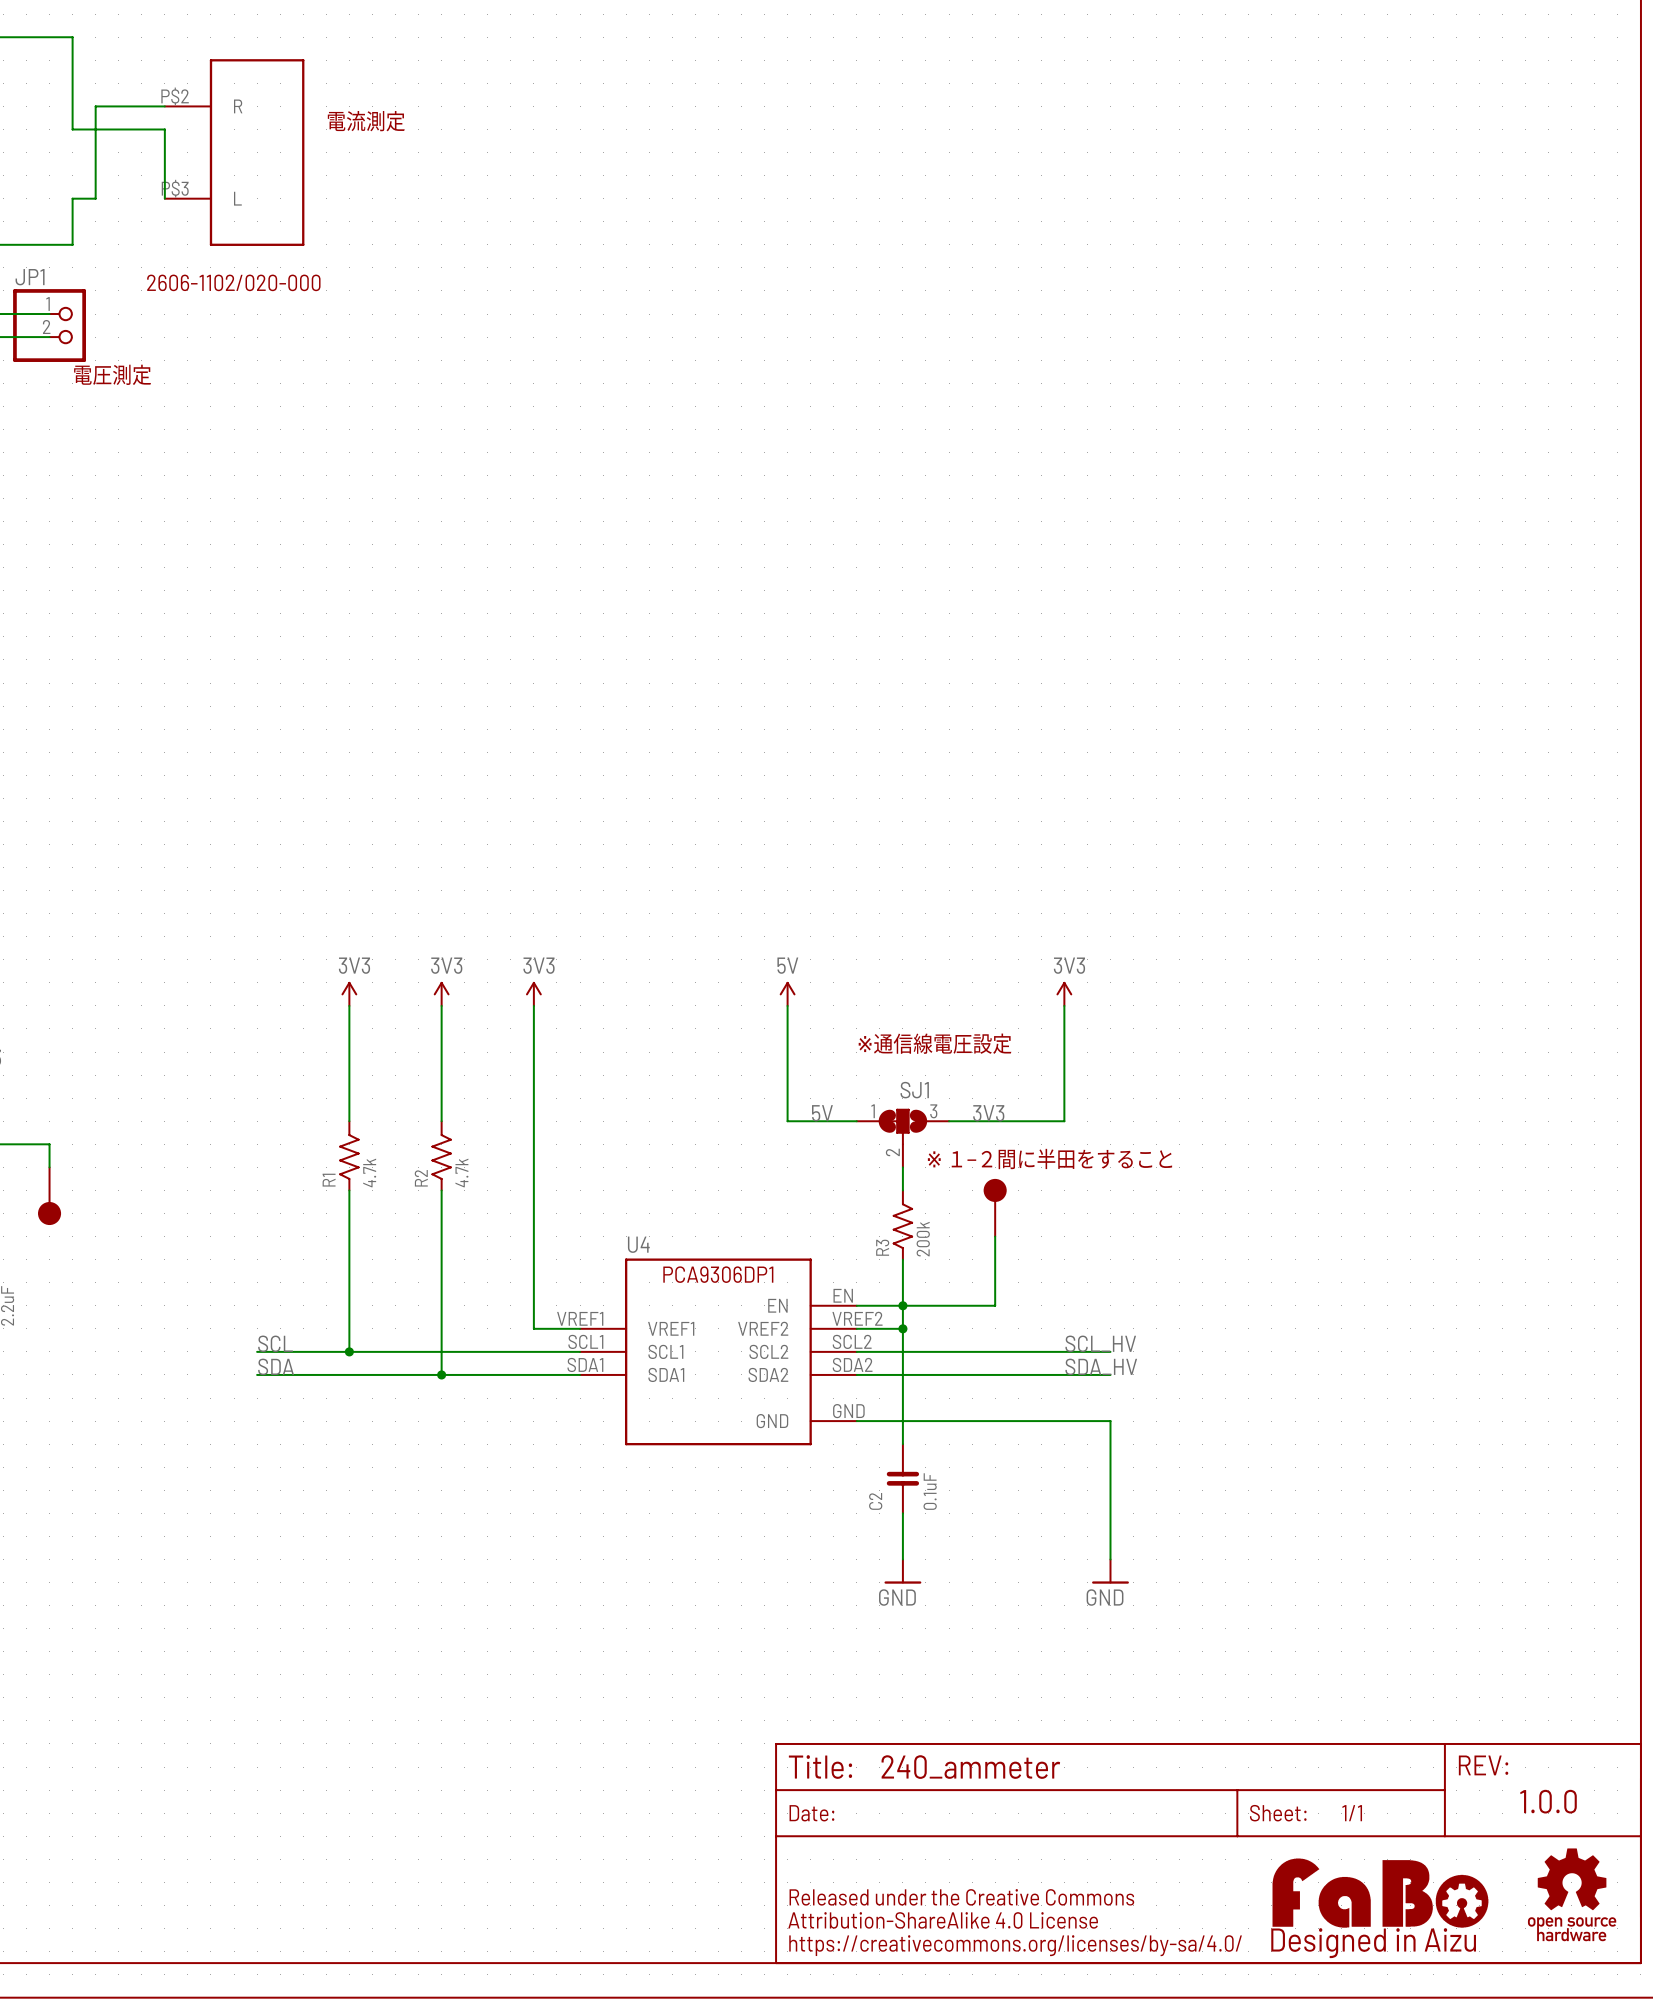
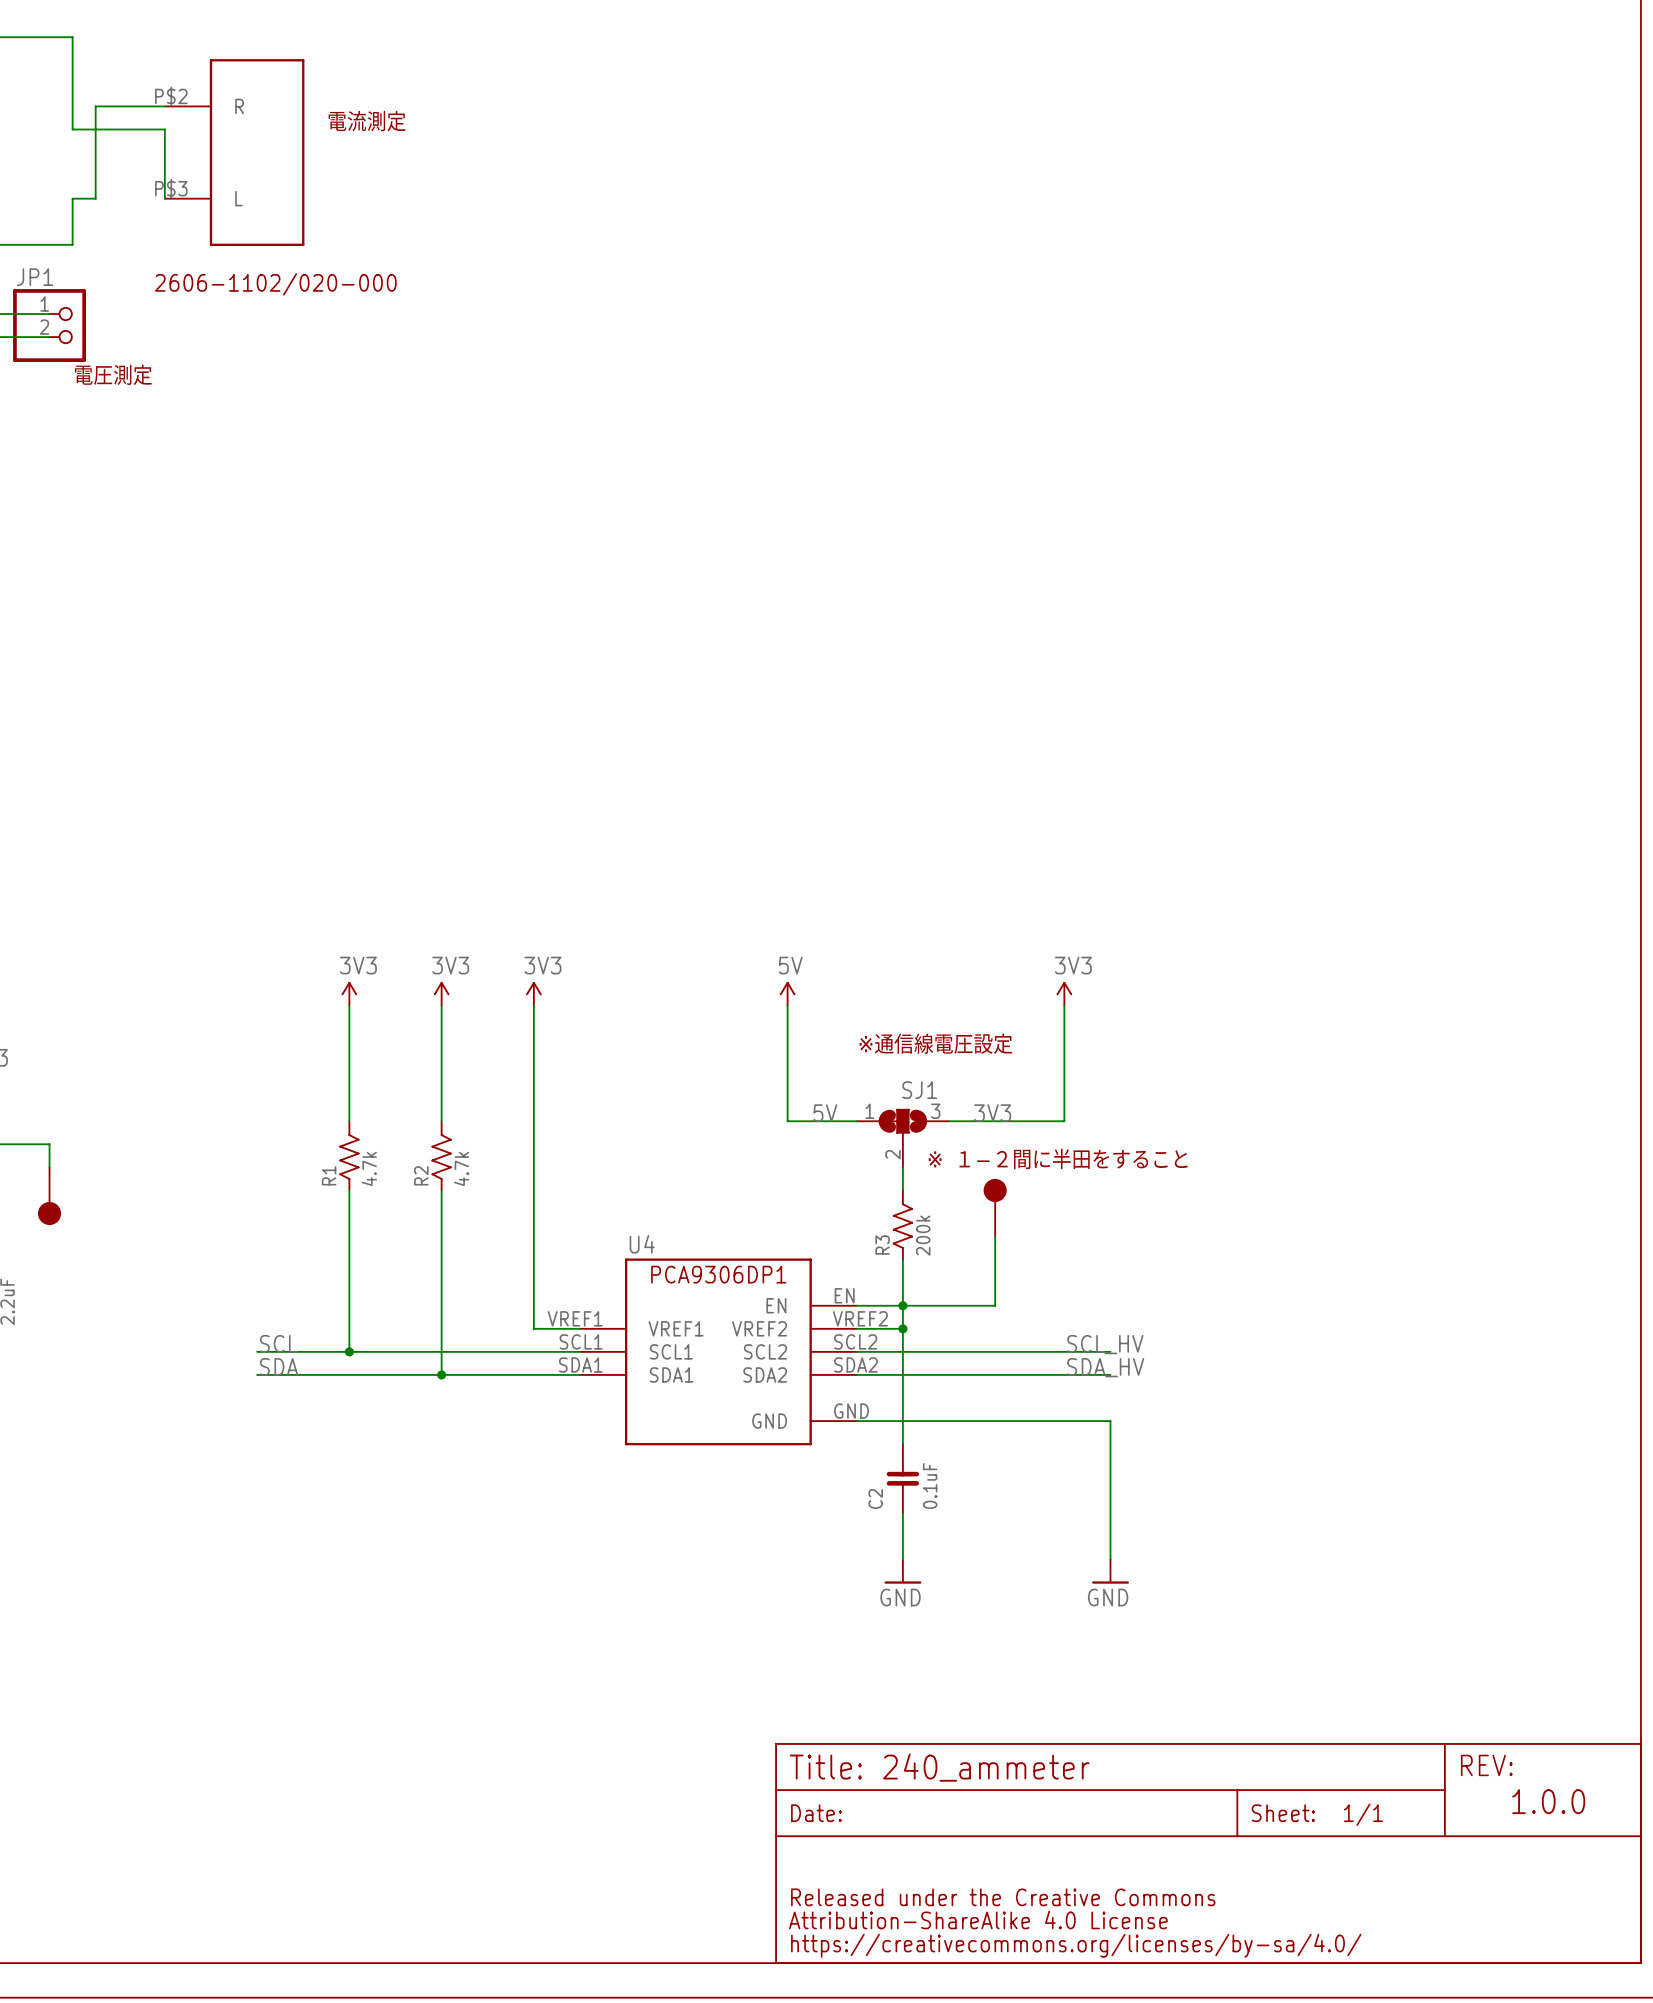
part: (1380, 1893) -> none
part: (1572, 1894) -> none

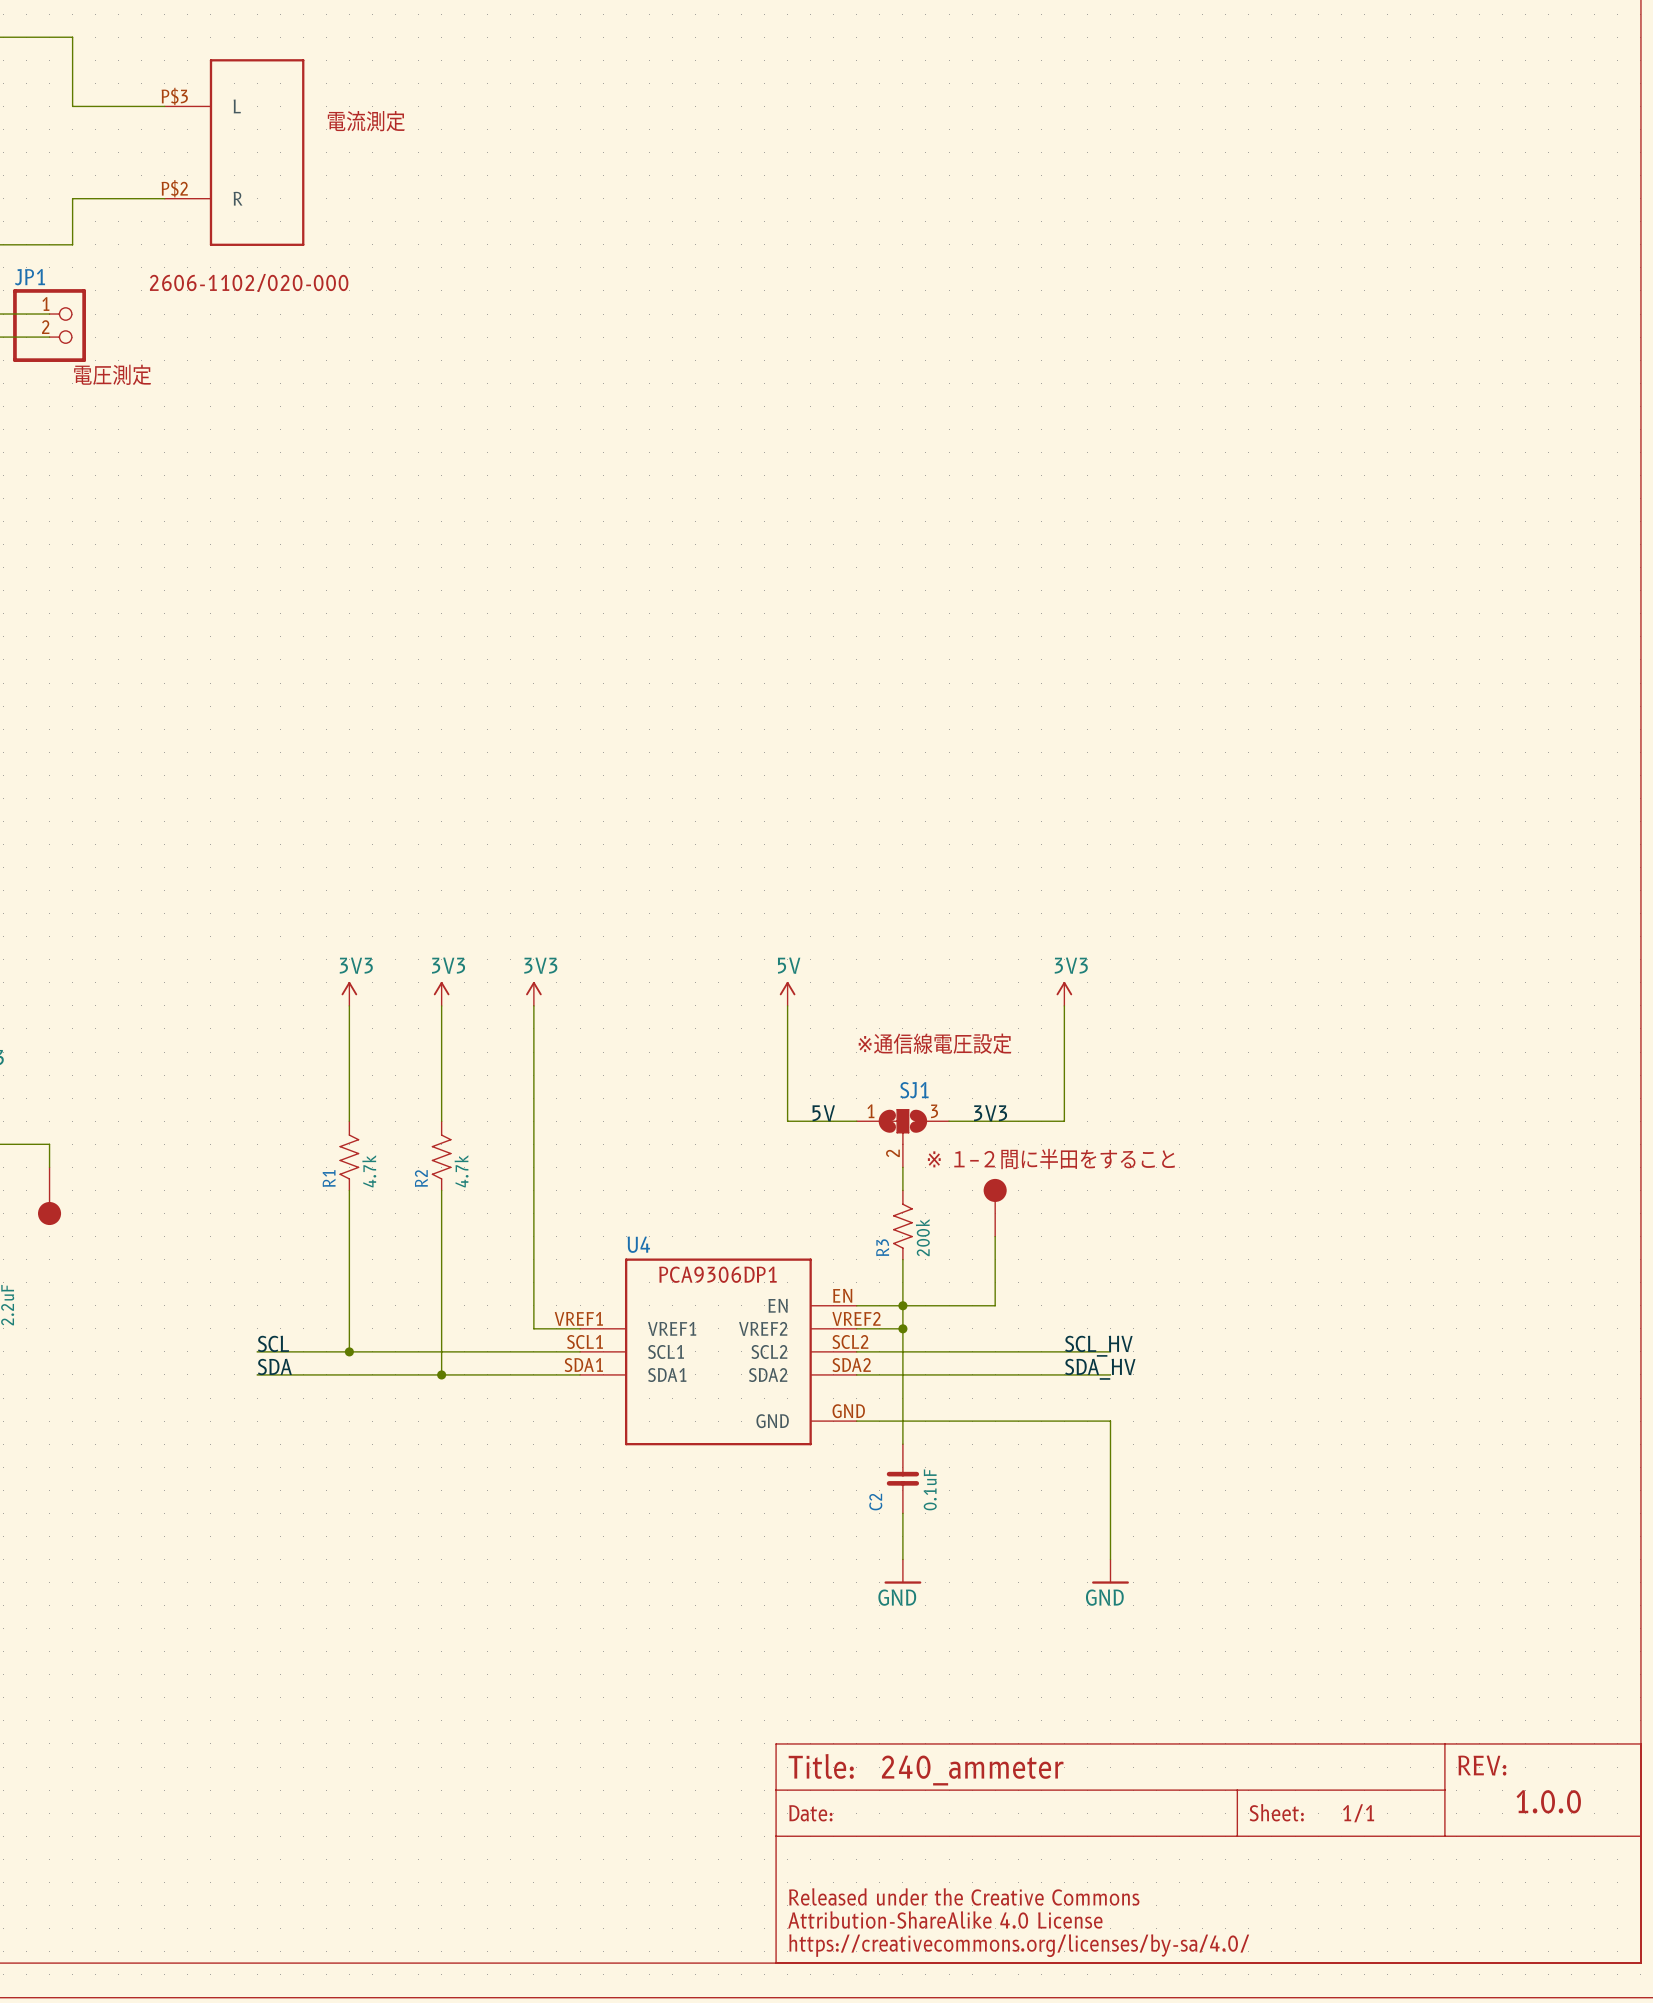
wire: (72, 106) (72, 129) (164, 129) (164, 198) -> (95, 198) (164, 198)
wire: (95, 106) (95, 198) -> (95, 106) (72, 106)
part flip: as is (257, 152) -> up-down (257, 152)

